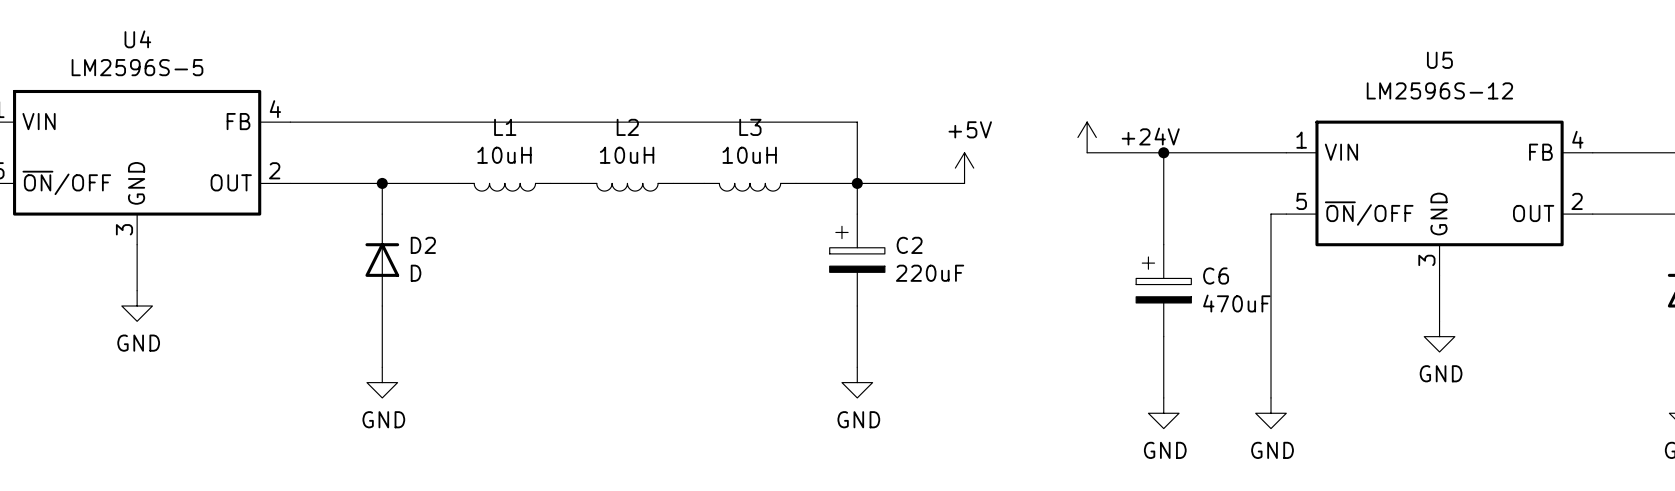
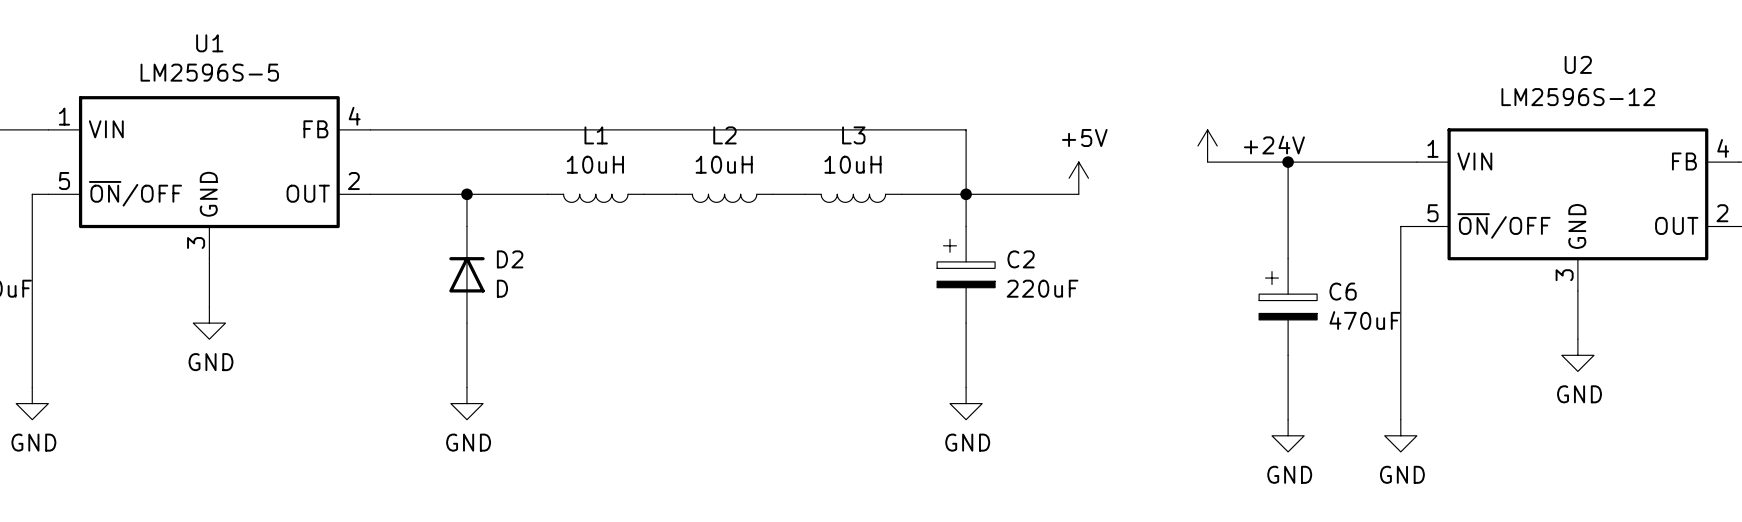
U4 name: U4 (137, 39) -> U1 (209, 43)
U5 name: U5 (1439, 60) -> U2 (1578, 64)

